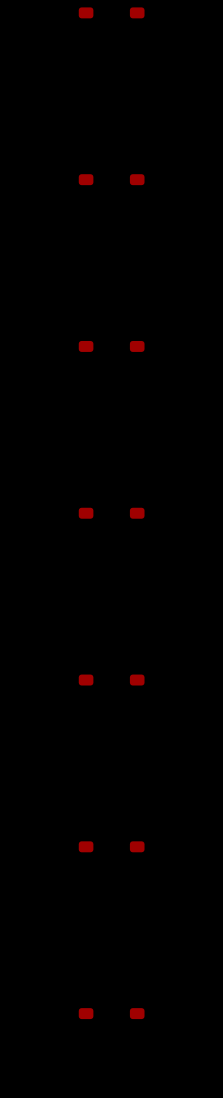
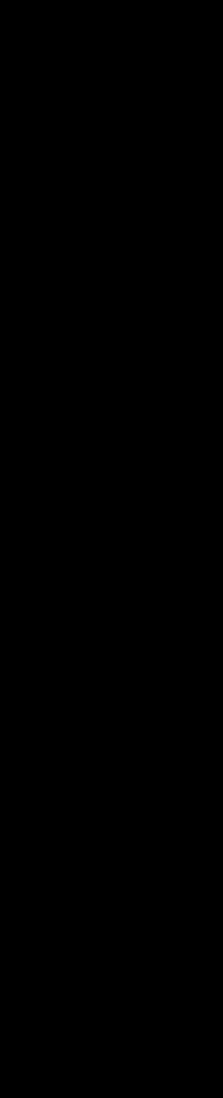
part: (111, 12) -> none
part: (111, 179) -> none
part: (111, 346) -> none
part: (111, 513) -> none
part: (111, 680) -> none
part: (111, 846) -> none
part: (111, 1013) -> none

